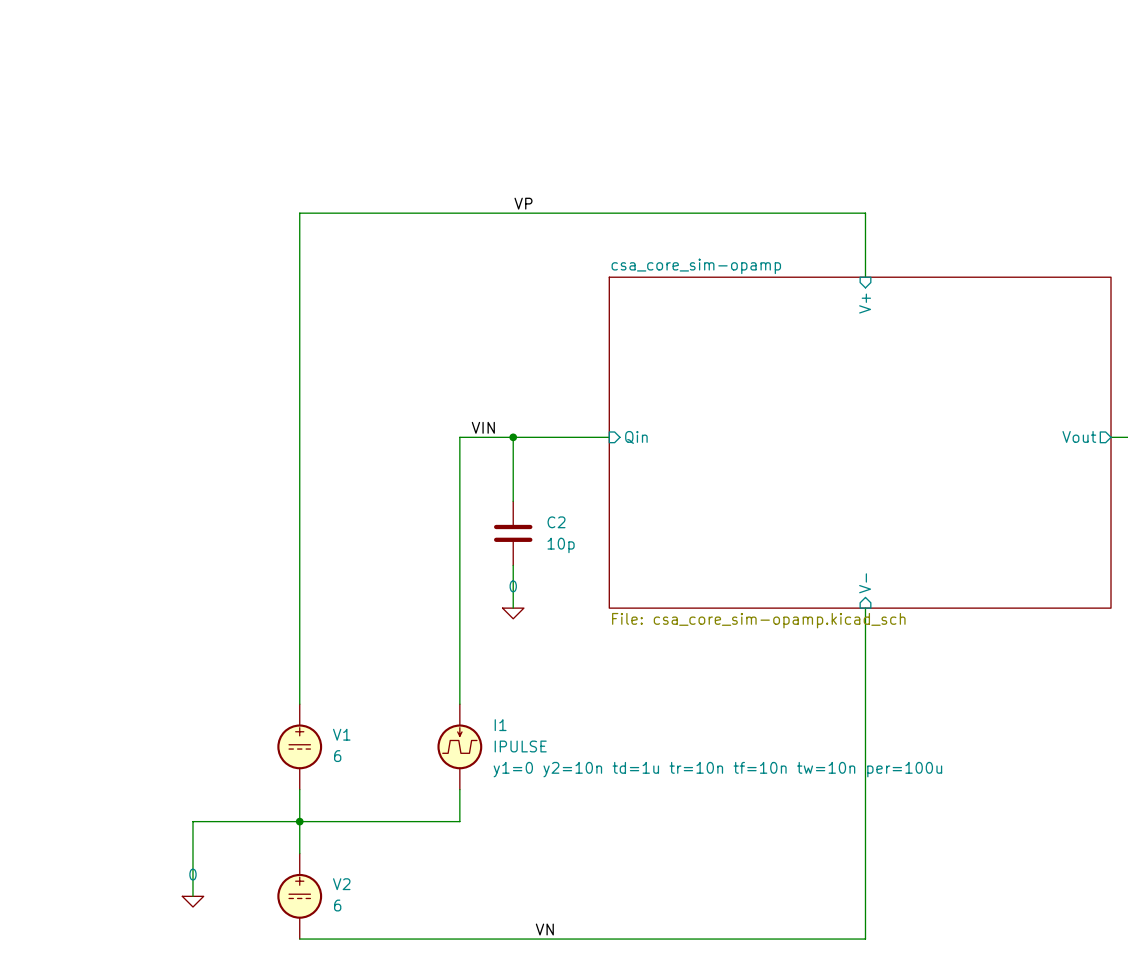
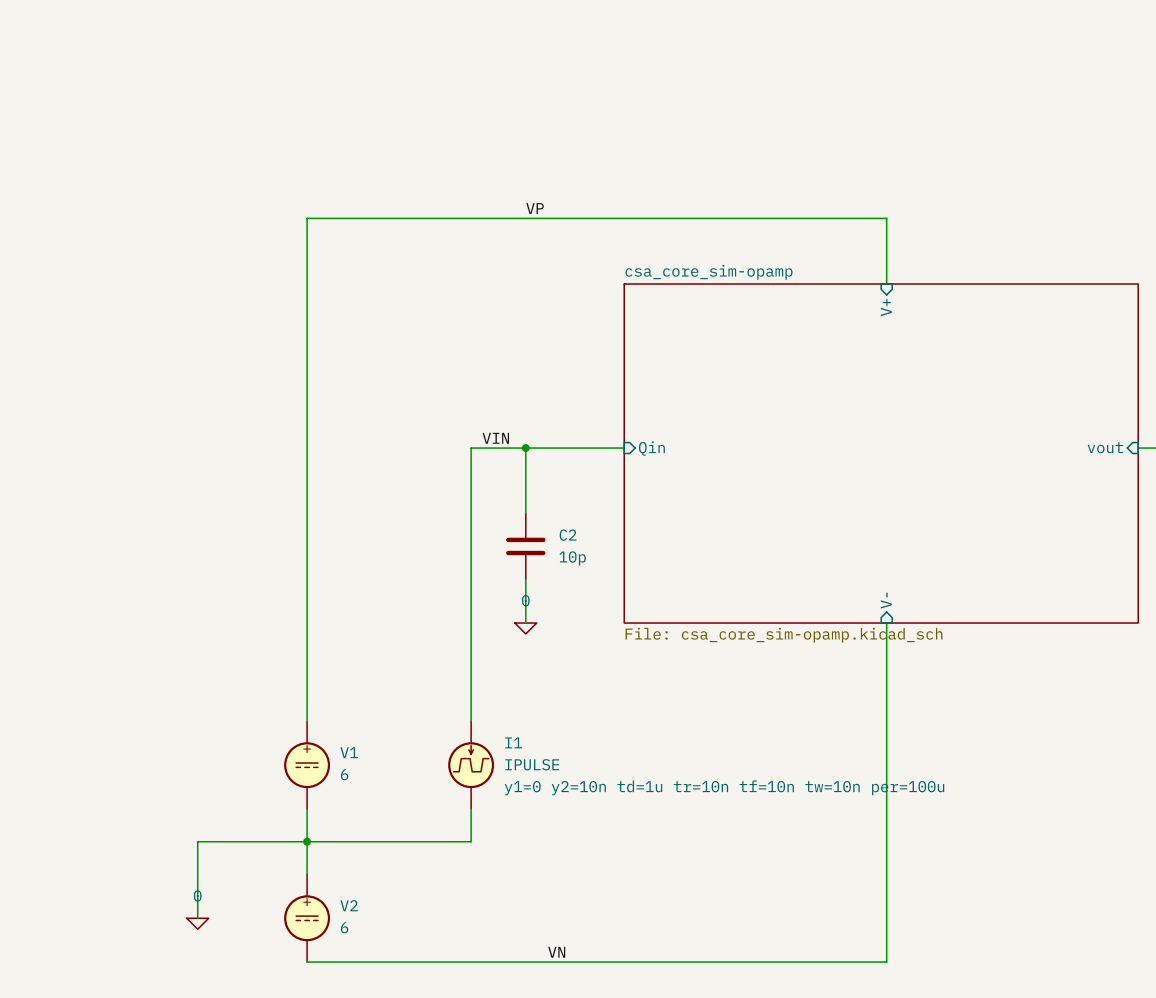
sheet pin shape: output (1079, 436) -> input (1105, 447)
sheet pin: Vout (1079, 436) -> vout (1105, 447)

